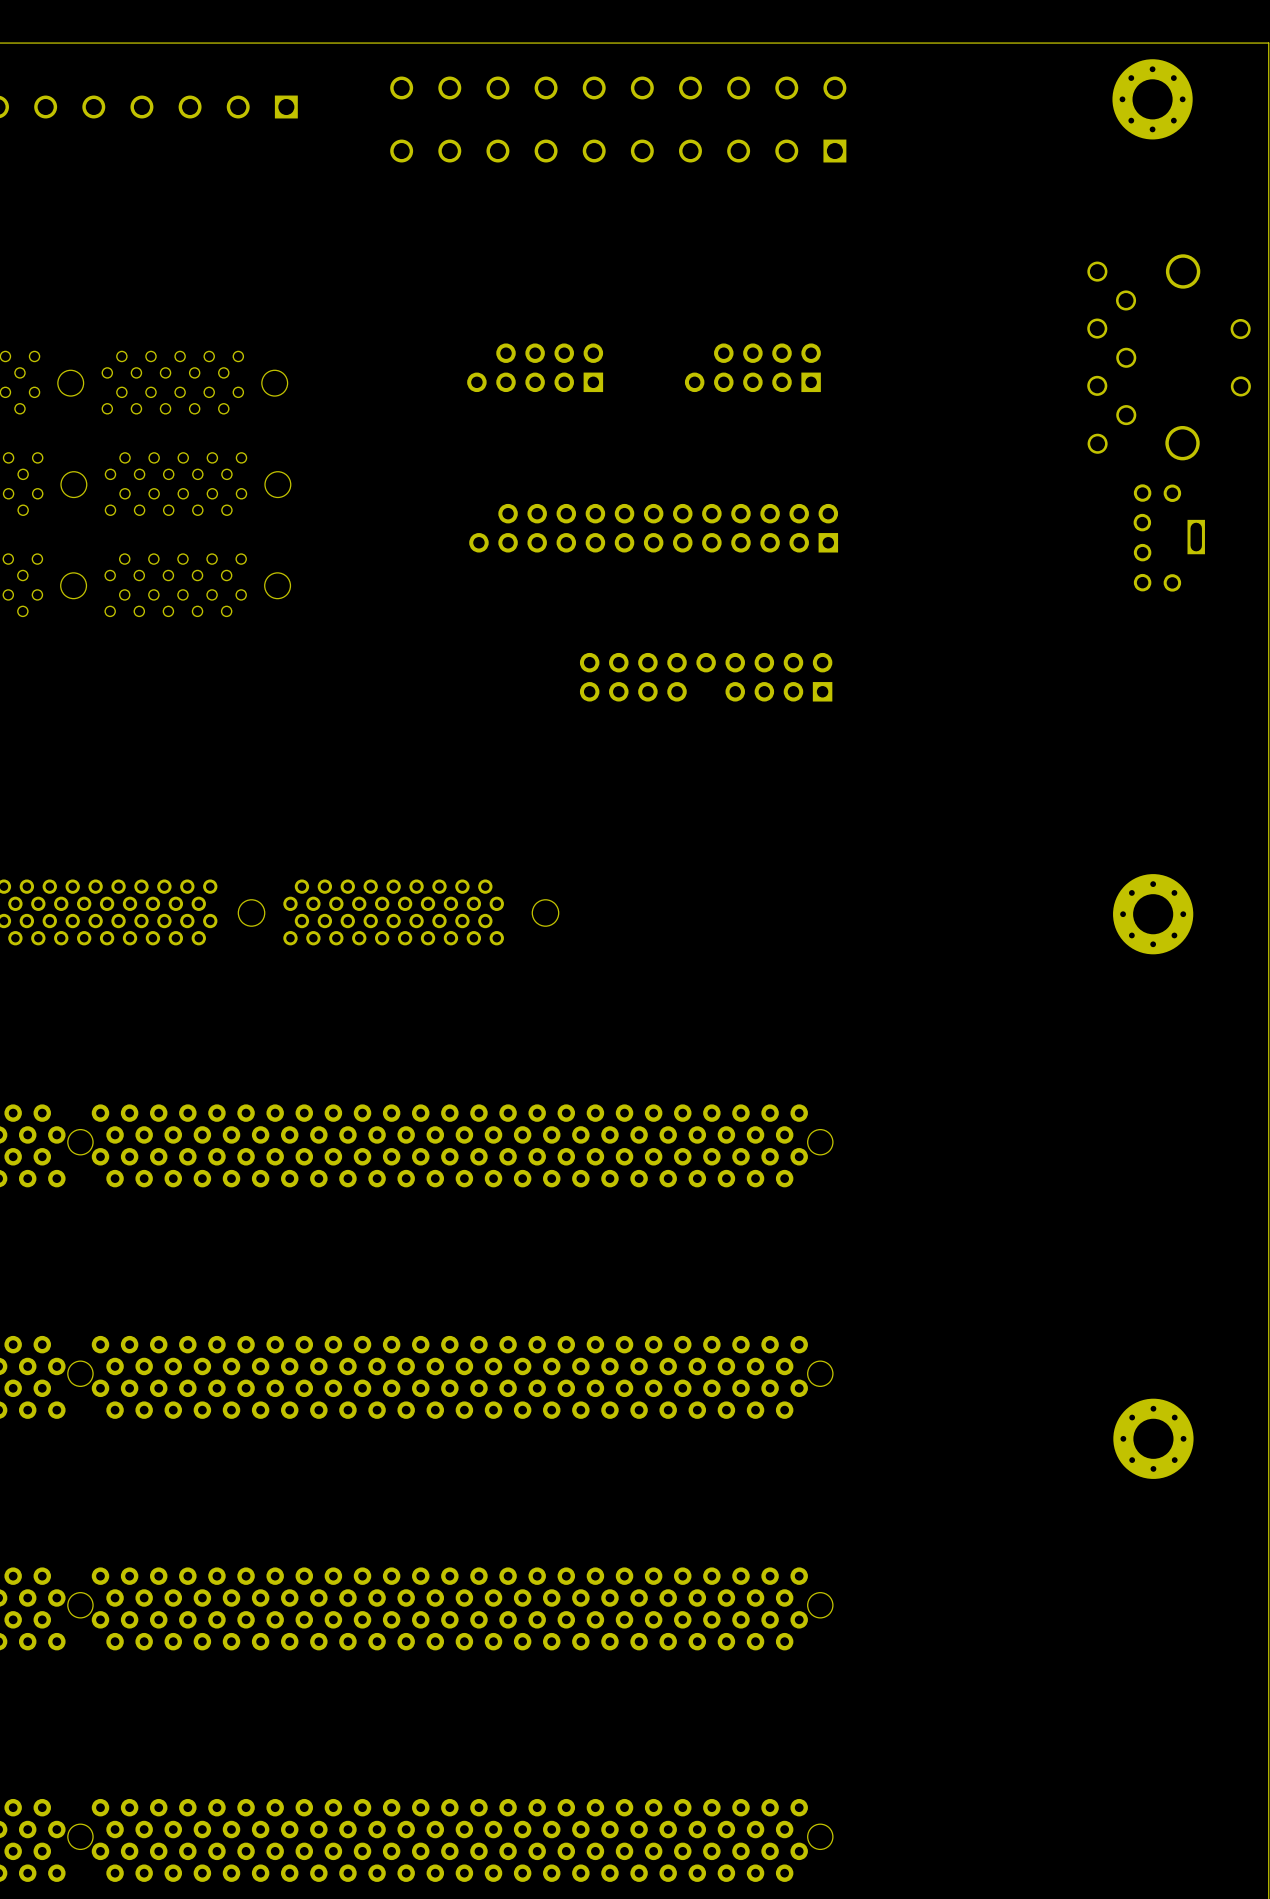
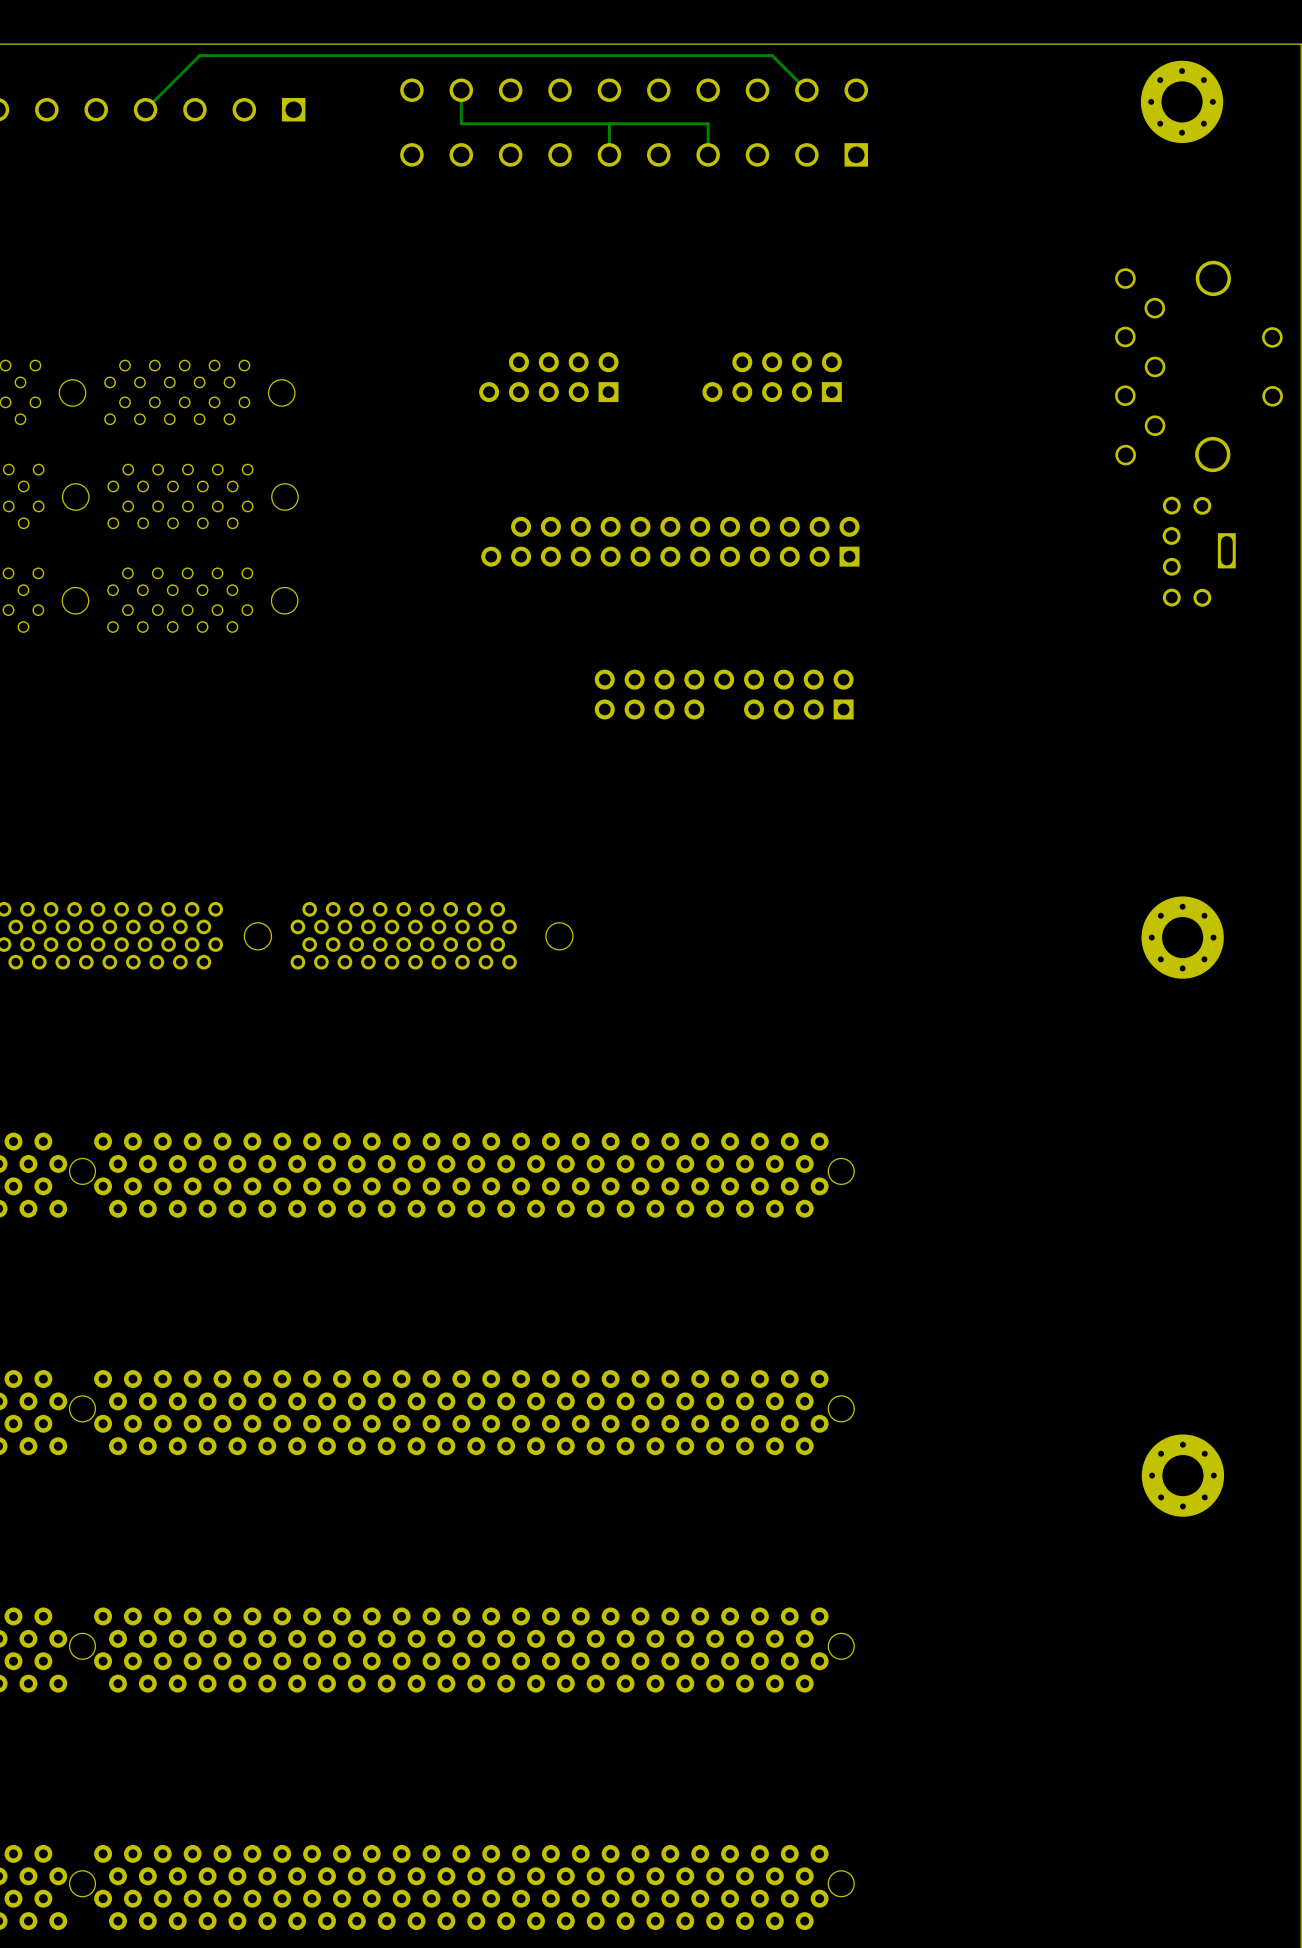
track: none -> (461, 90) (461, 123) (707, 123) (708, 154)
track: none -> (806, 90) (772, 55) (199, 55) (145, 109)
track: none -> (610, 123) (609, 154)

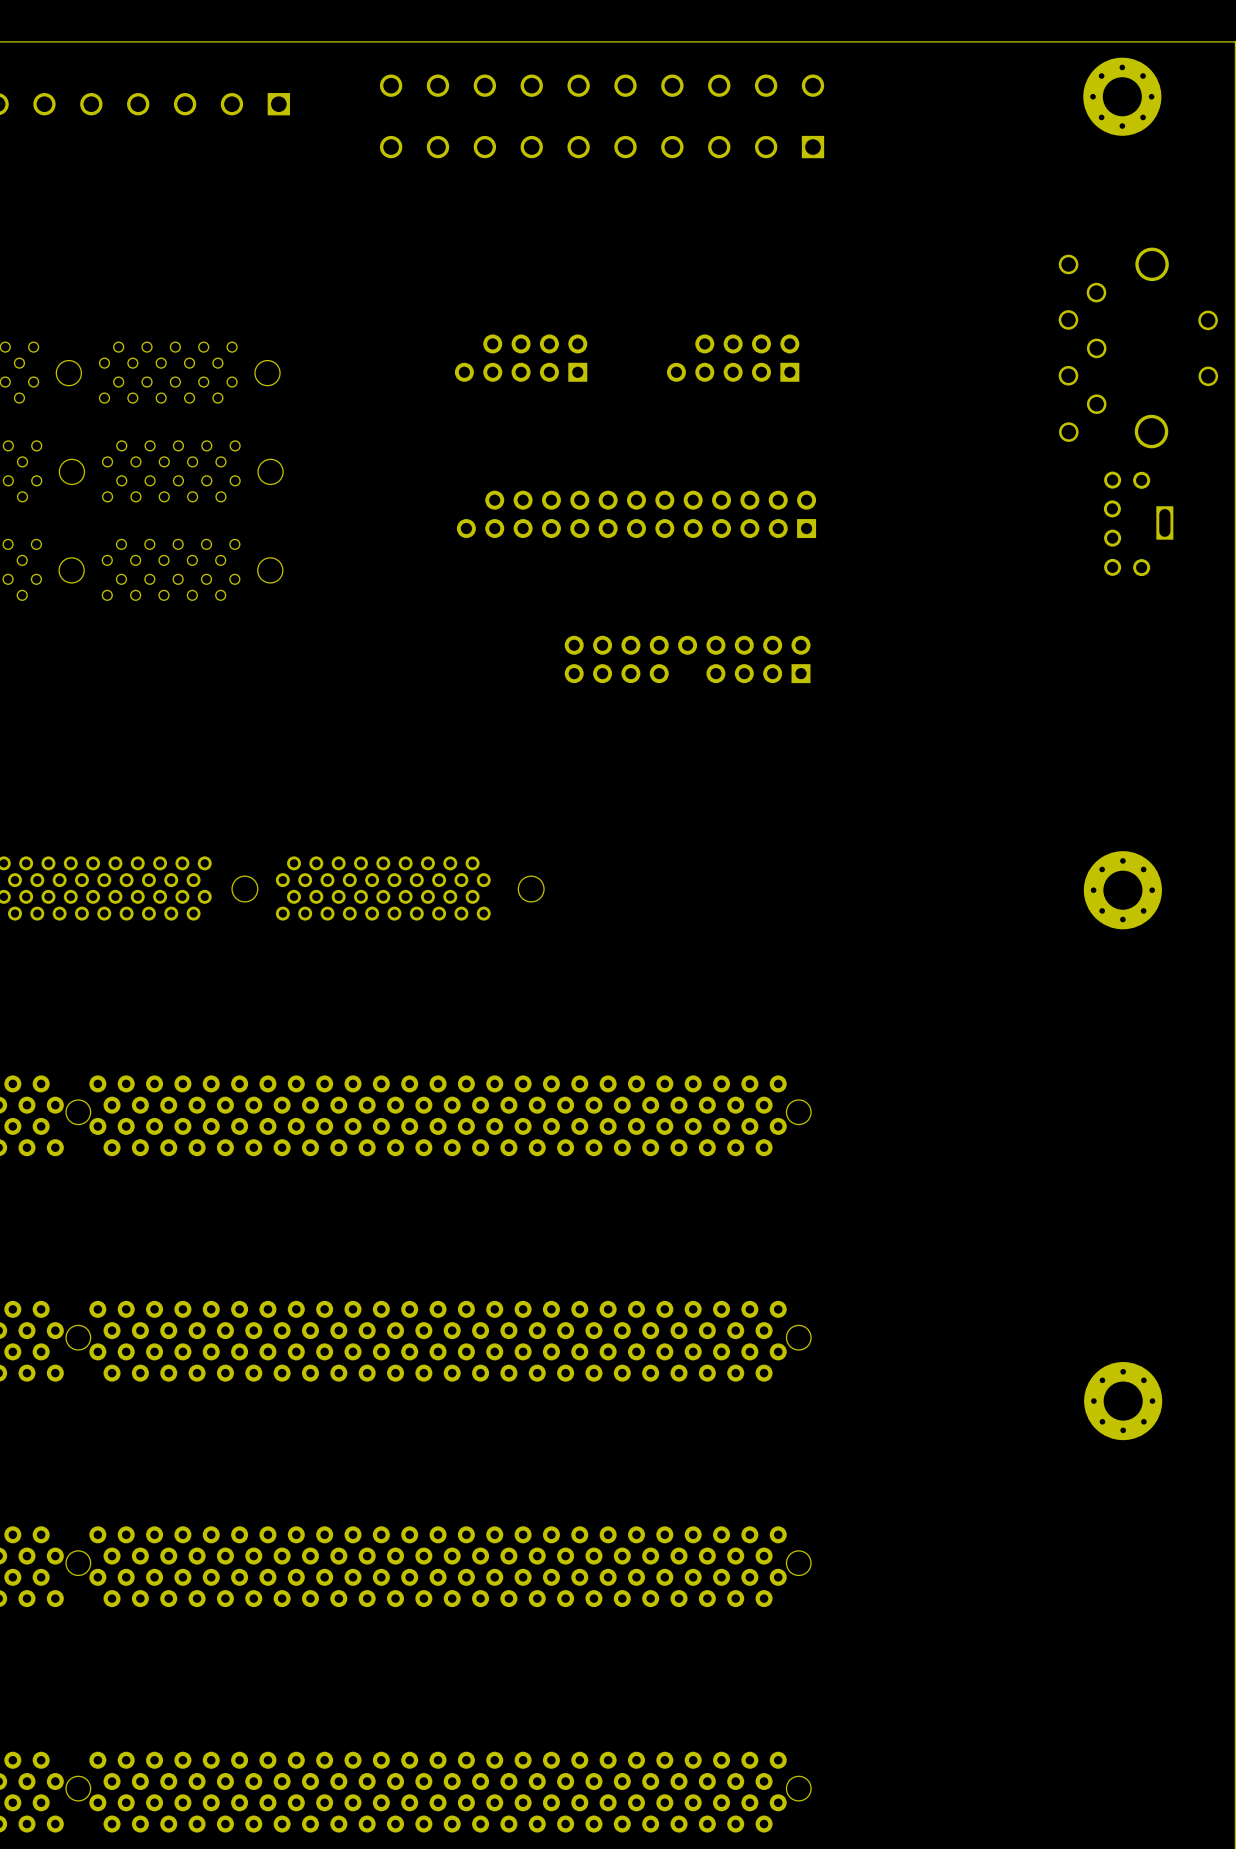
track: (461, 90) (461, 123) (707, 123) (708, 154) -> none
track: (806, 90) (772, 55) (199, 55) (145, 109) -> none
track: (610, 123) (609, 154) -> none

